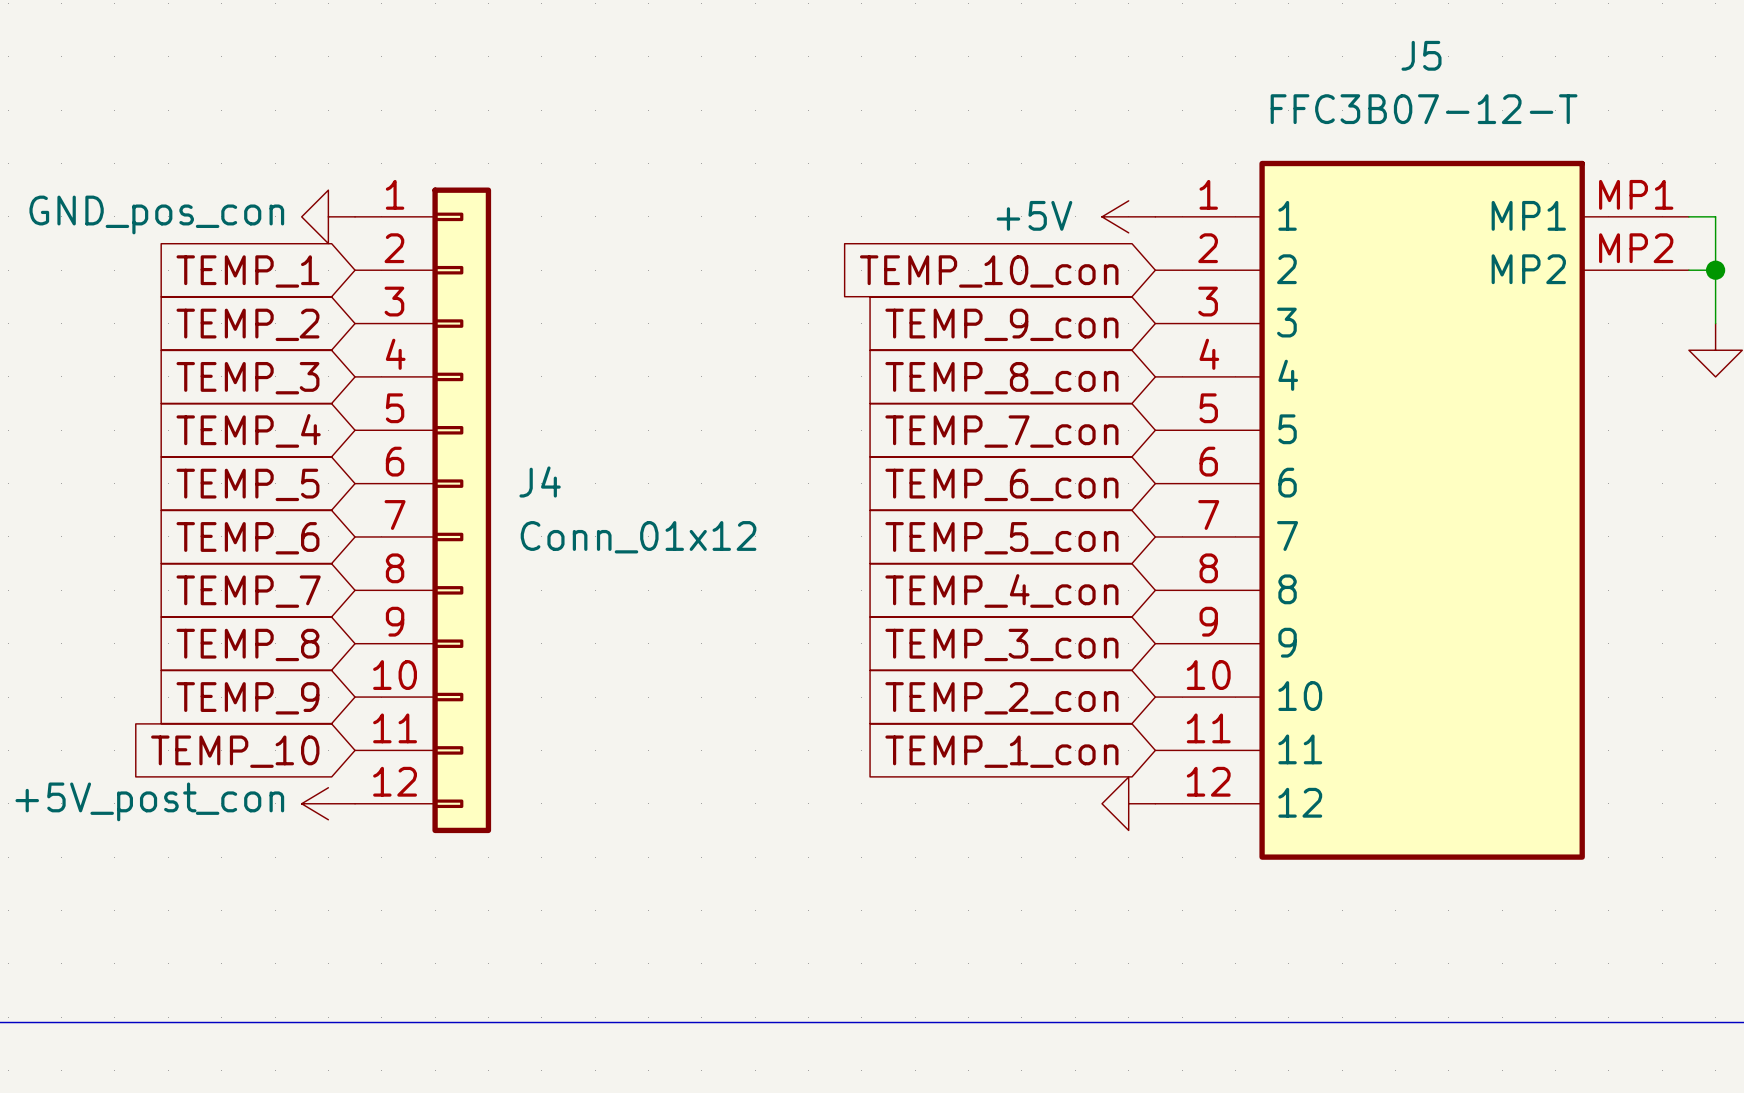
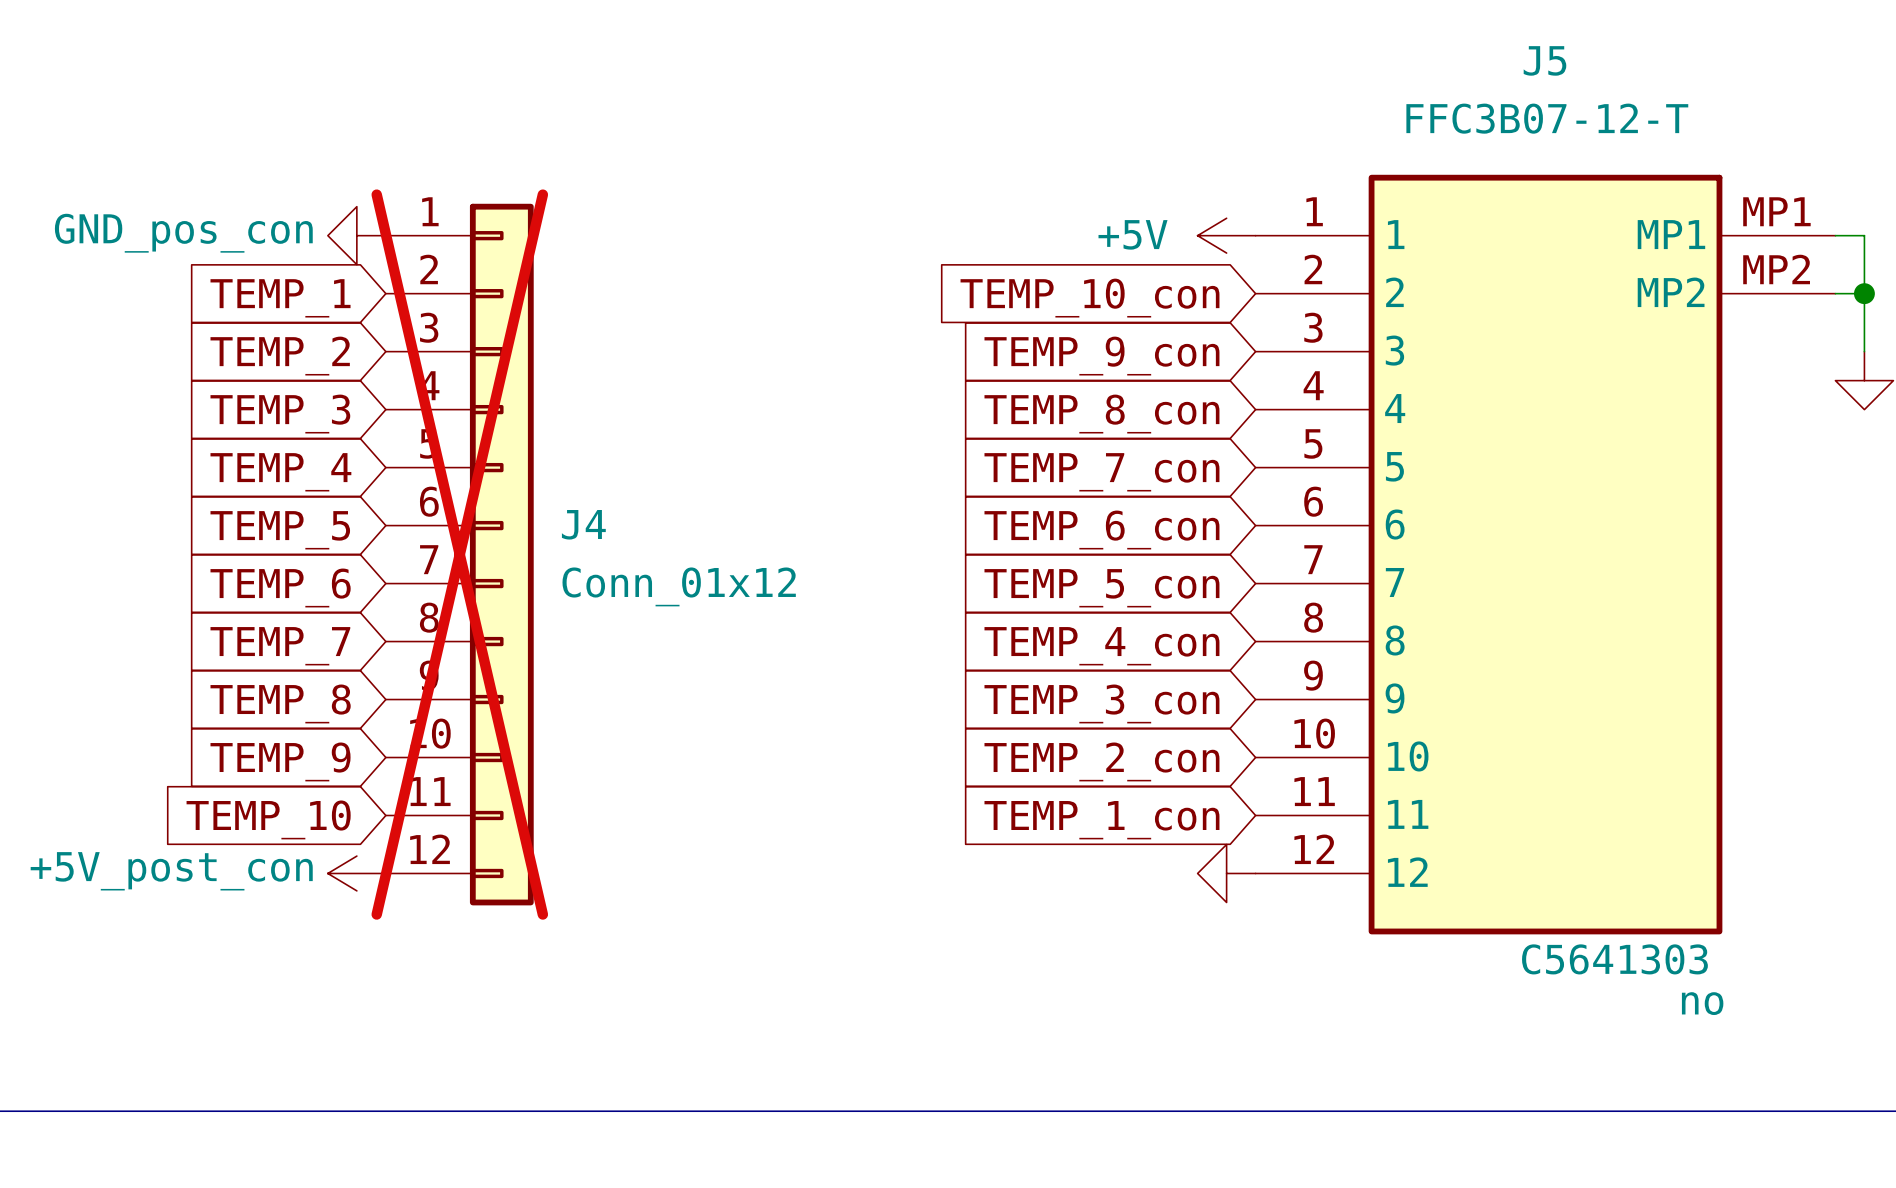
J4 do-not-place cross: none -> (459, 554)
J5 text: none -> C5641303 (1614, 959)
J5 text: none -> no (1702, 1003)

